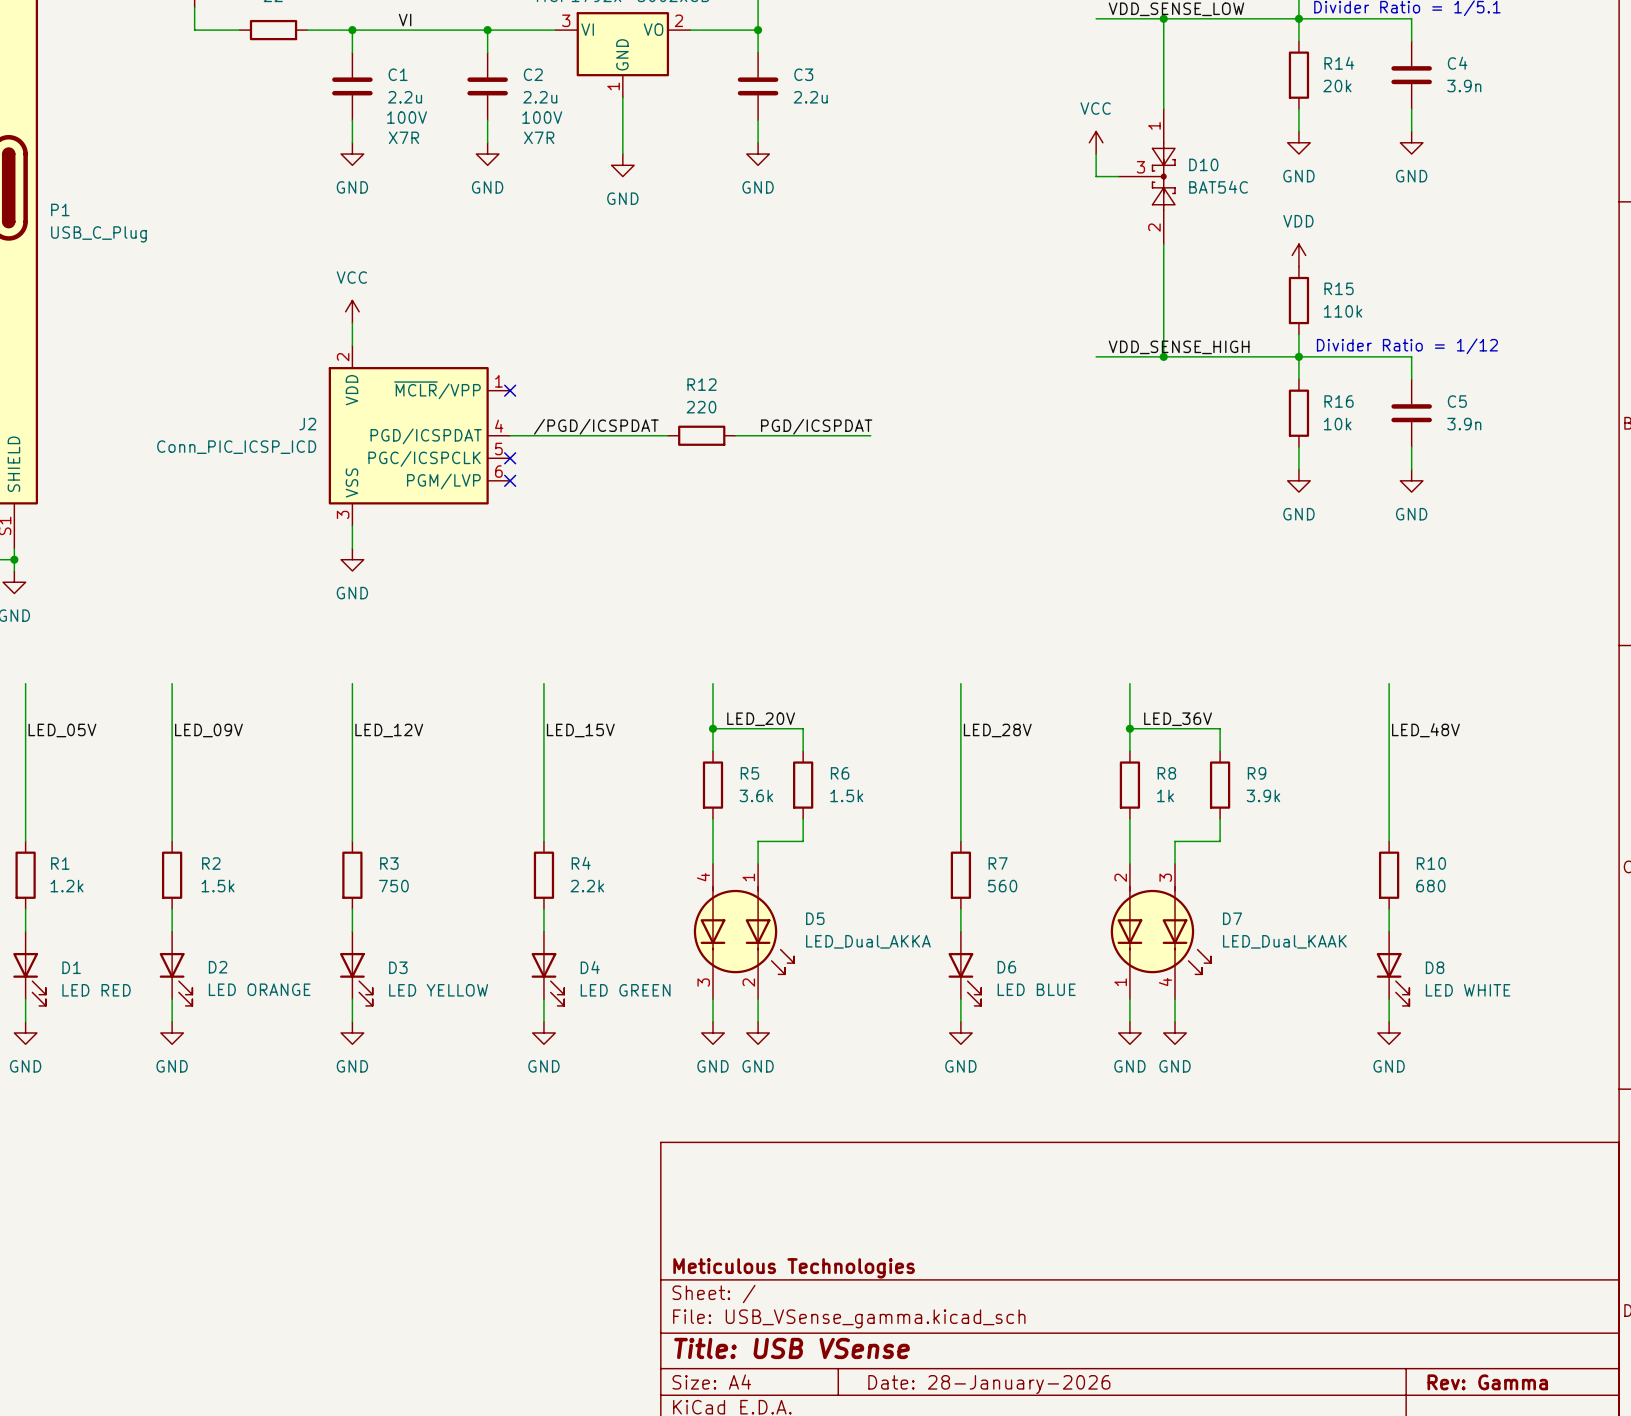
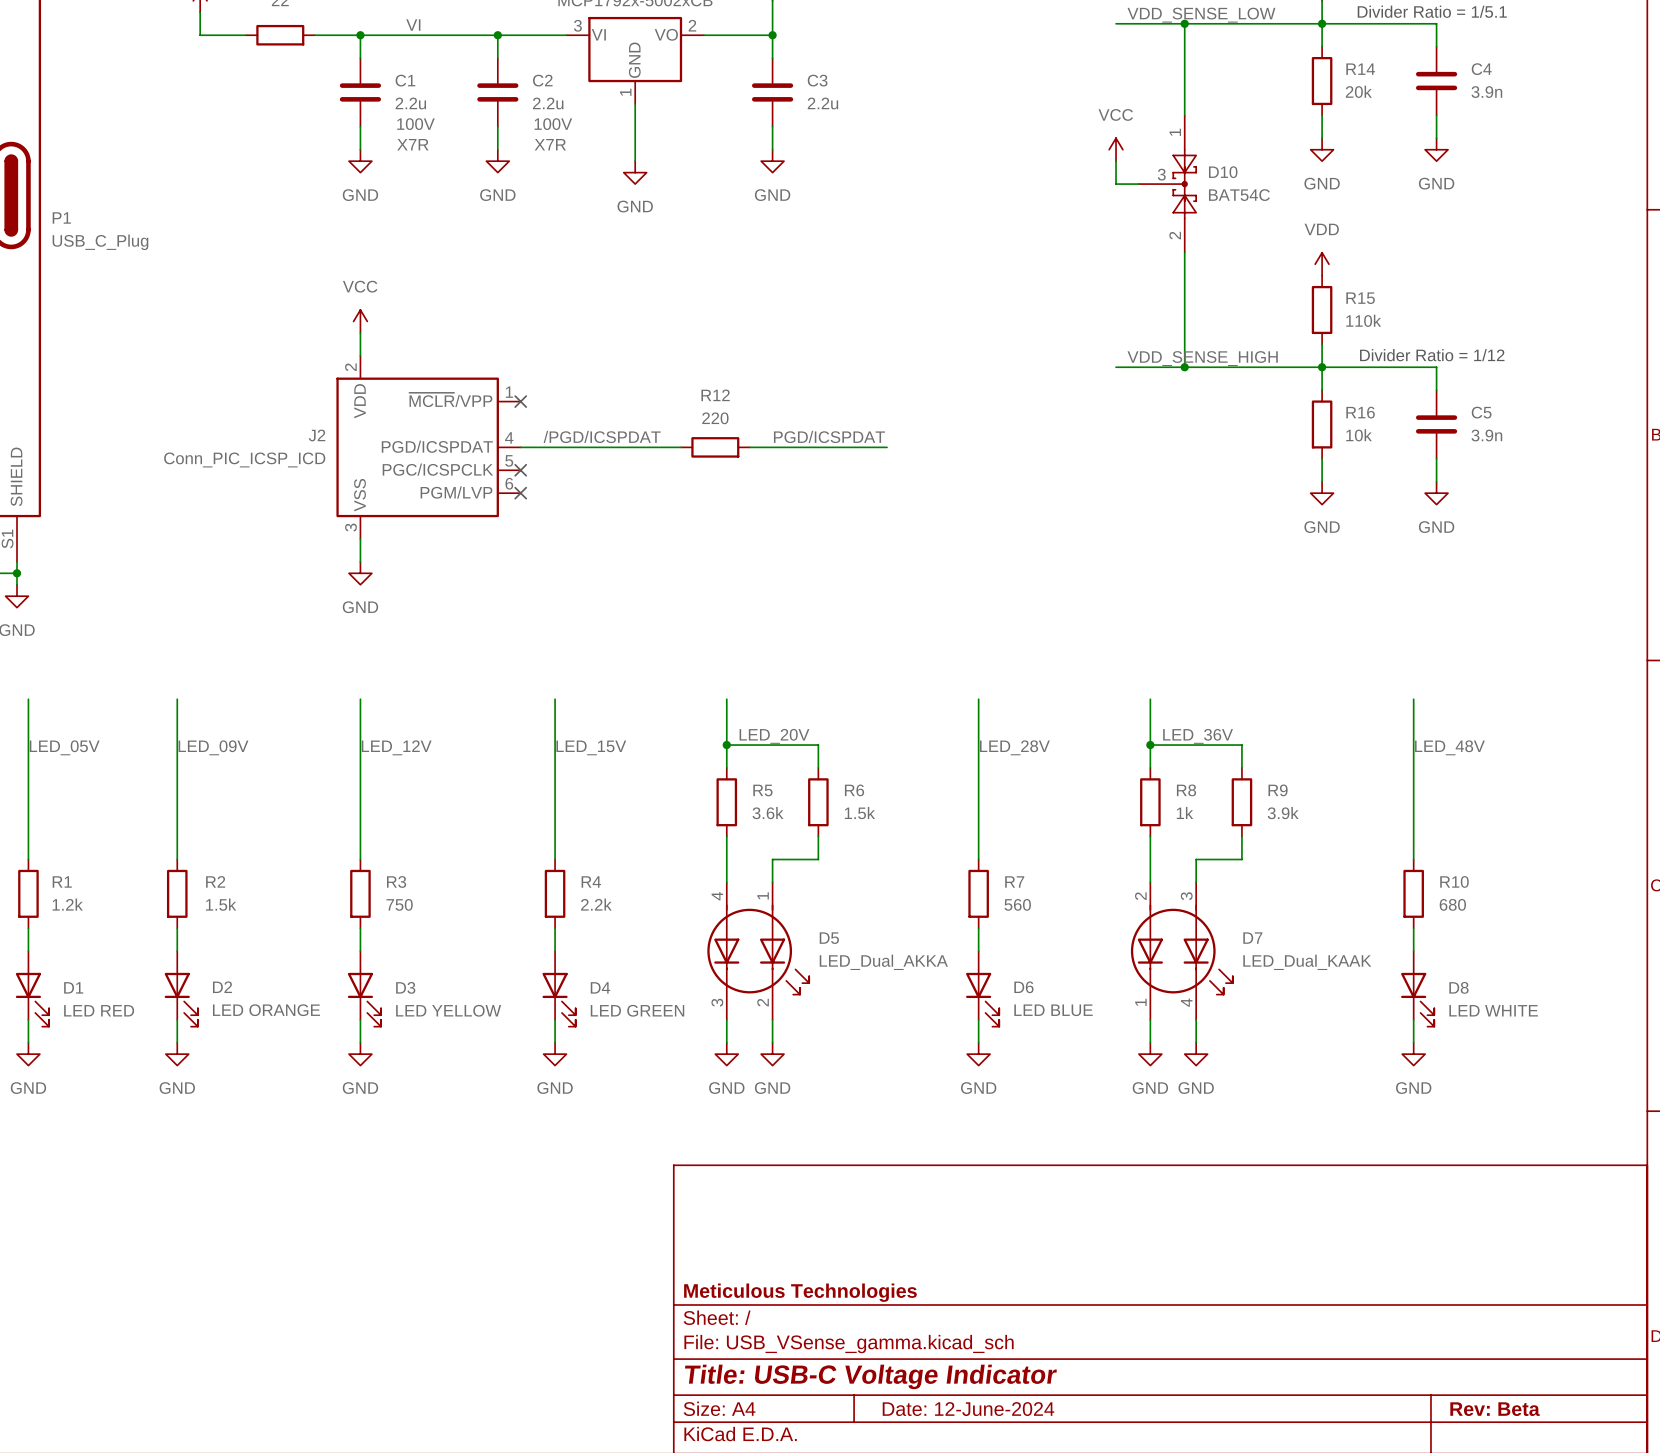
title block: Title: USB VSense (792, 1348) -> Title: USB-C Voltage Indicator (870, 1376)
title block: Rev: Gamma (1487, 1382) -> Rev: Beta (1495, 1409)
title block: Date: 28-January-2026 (989, 1384) -> Date: 12-June-2024 (968, 1409)

